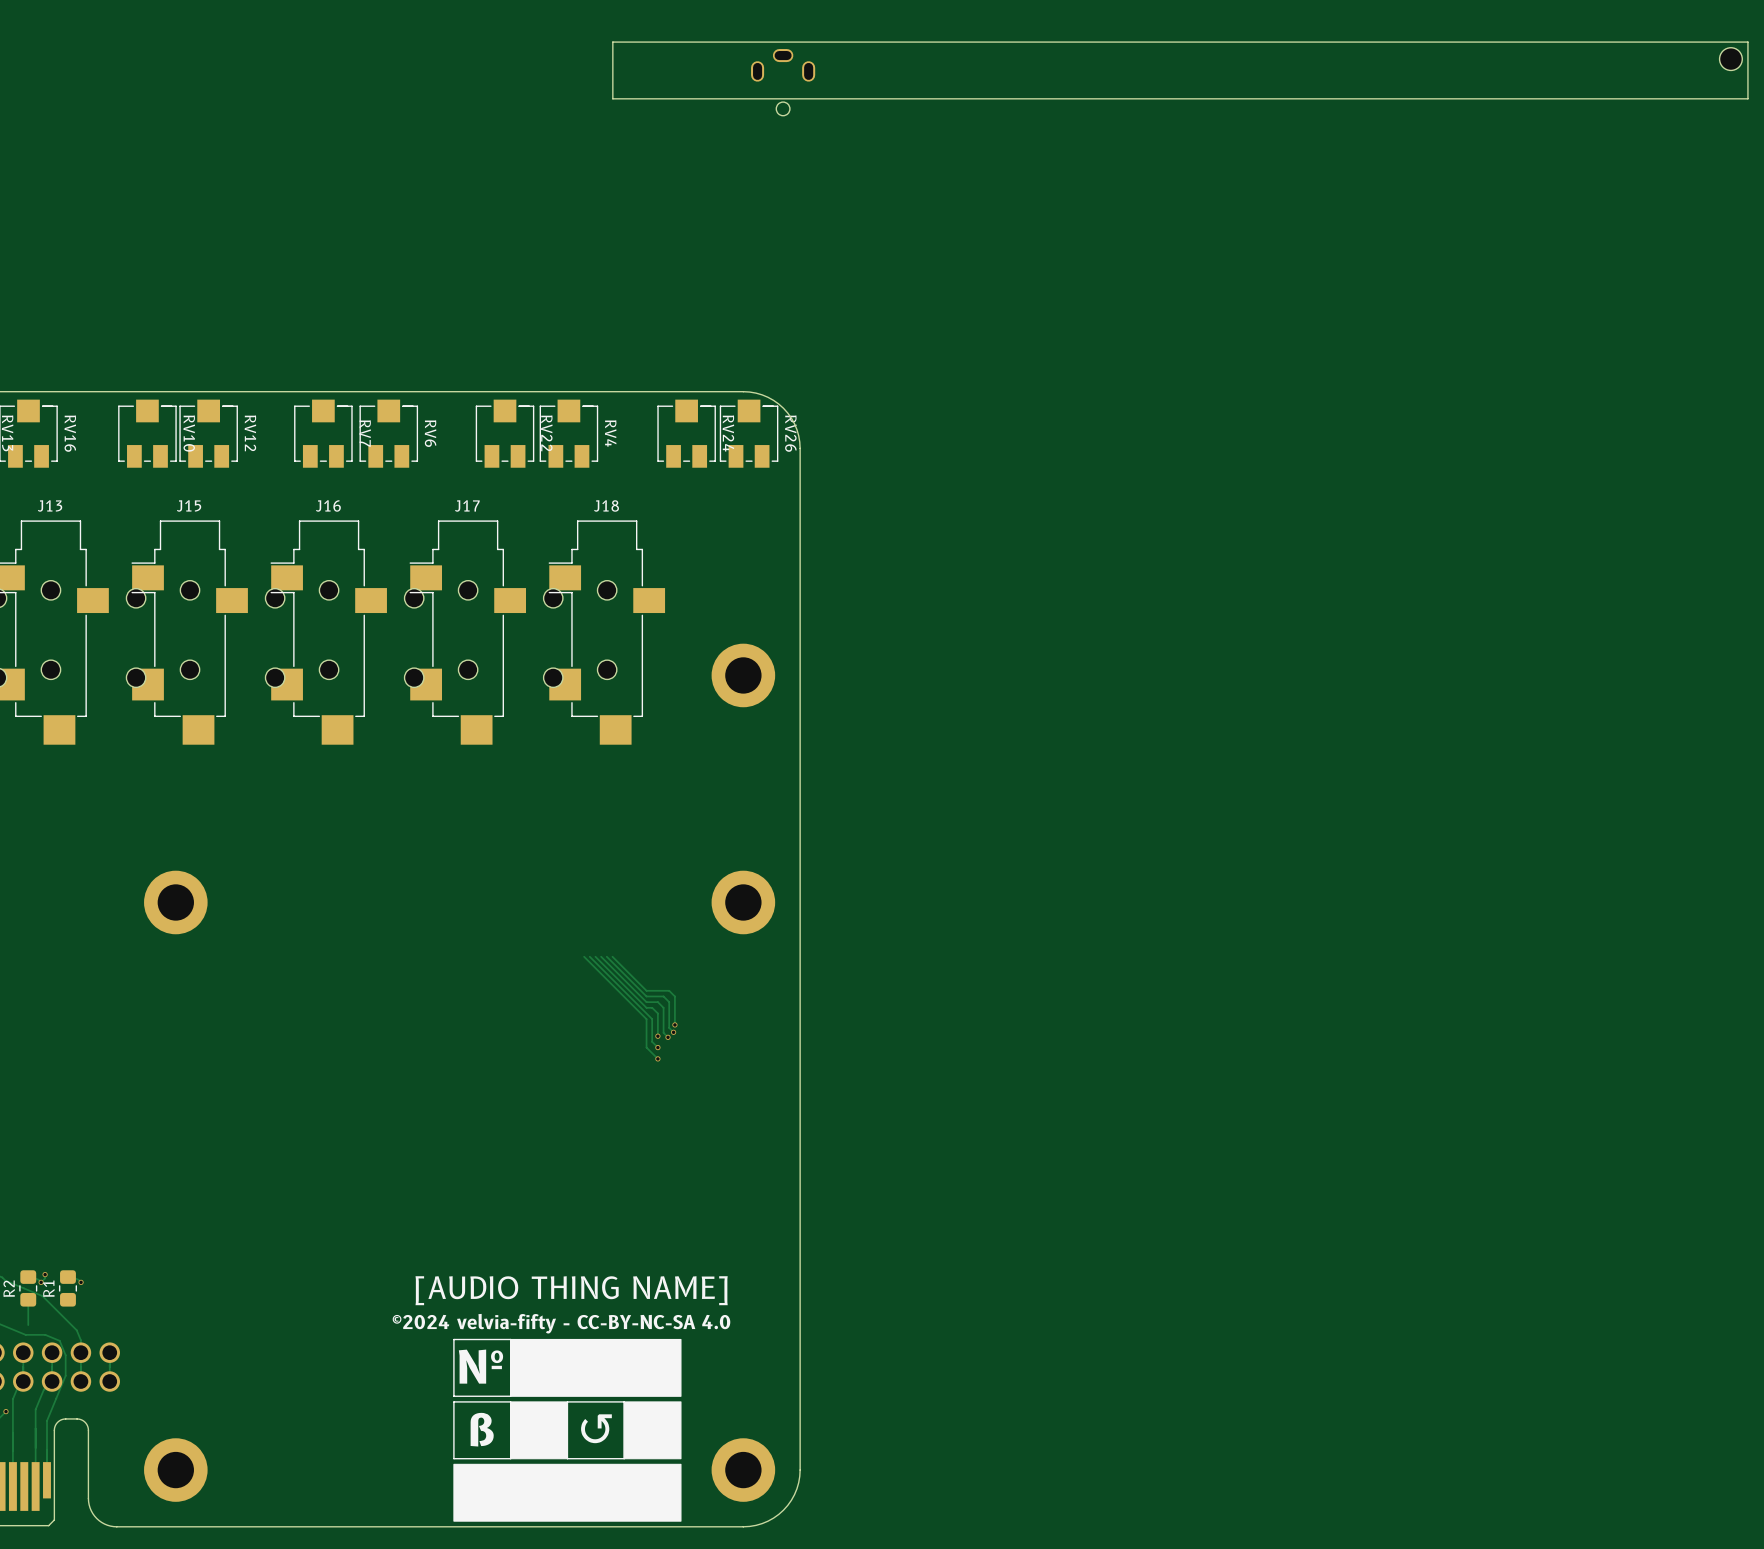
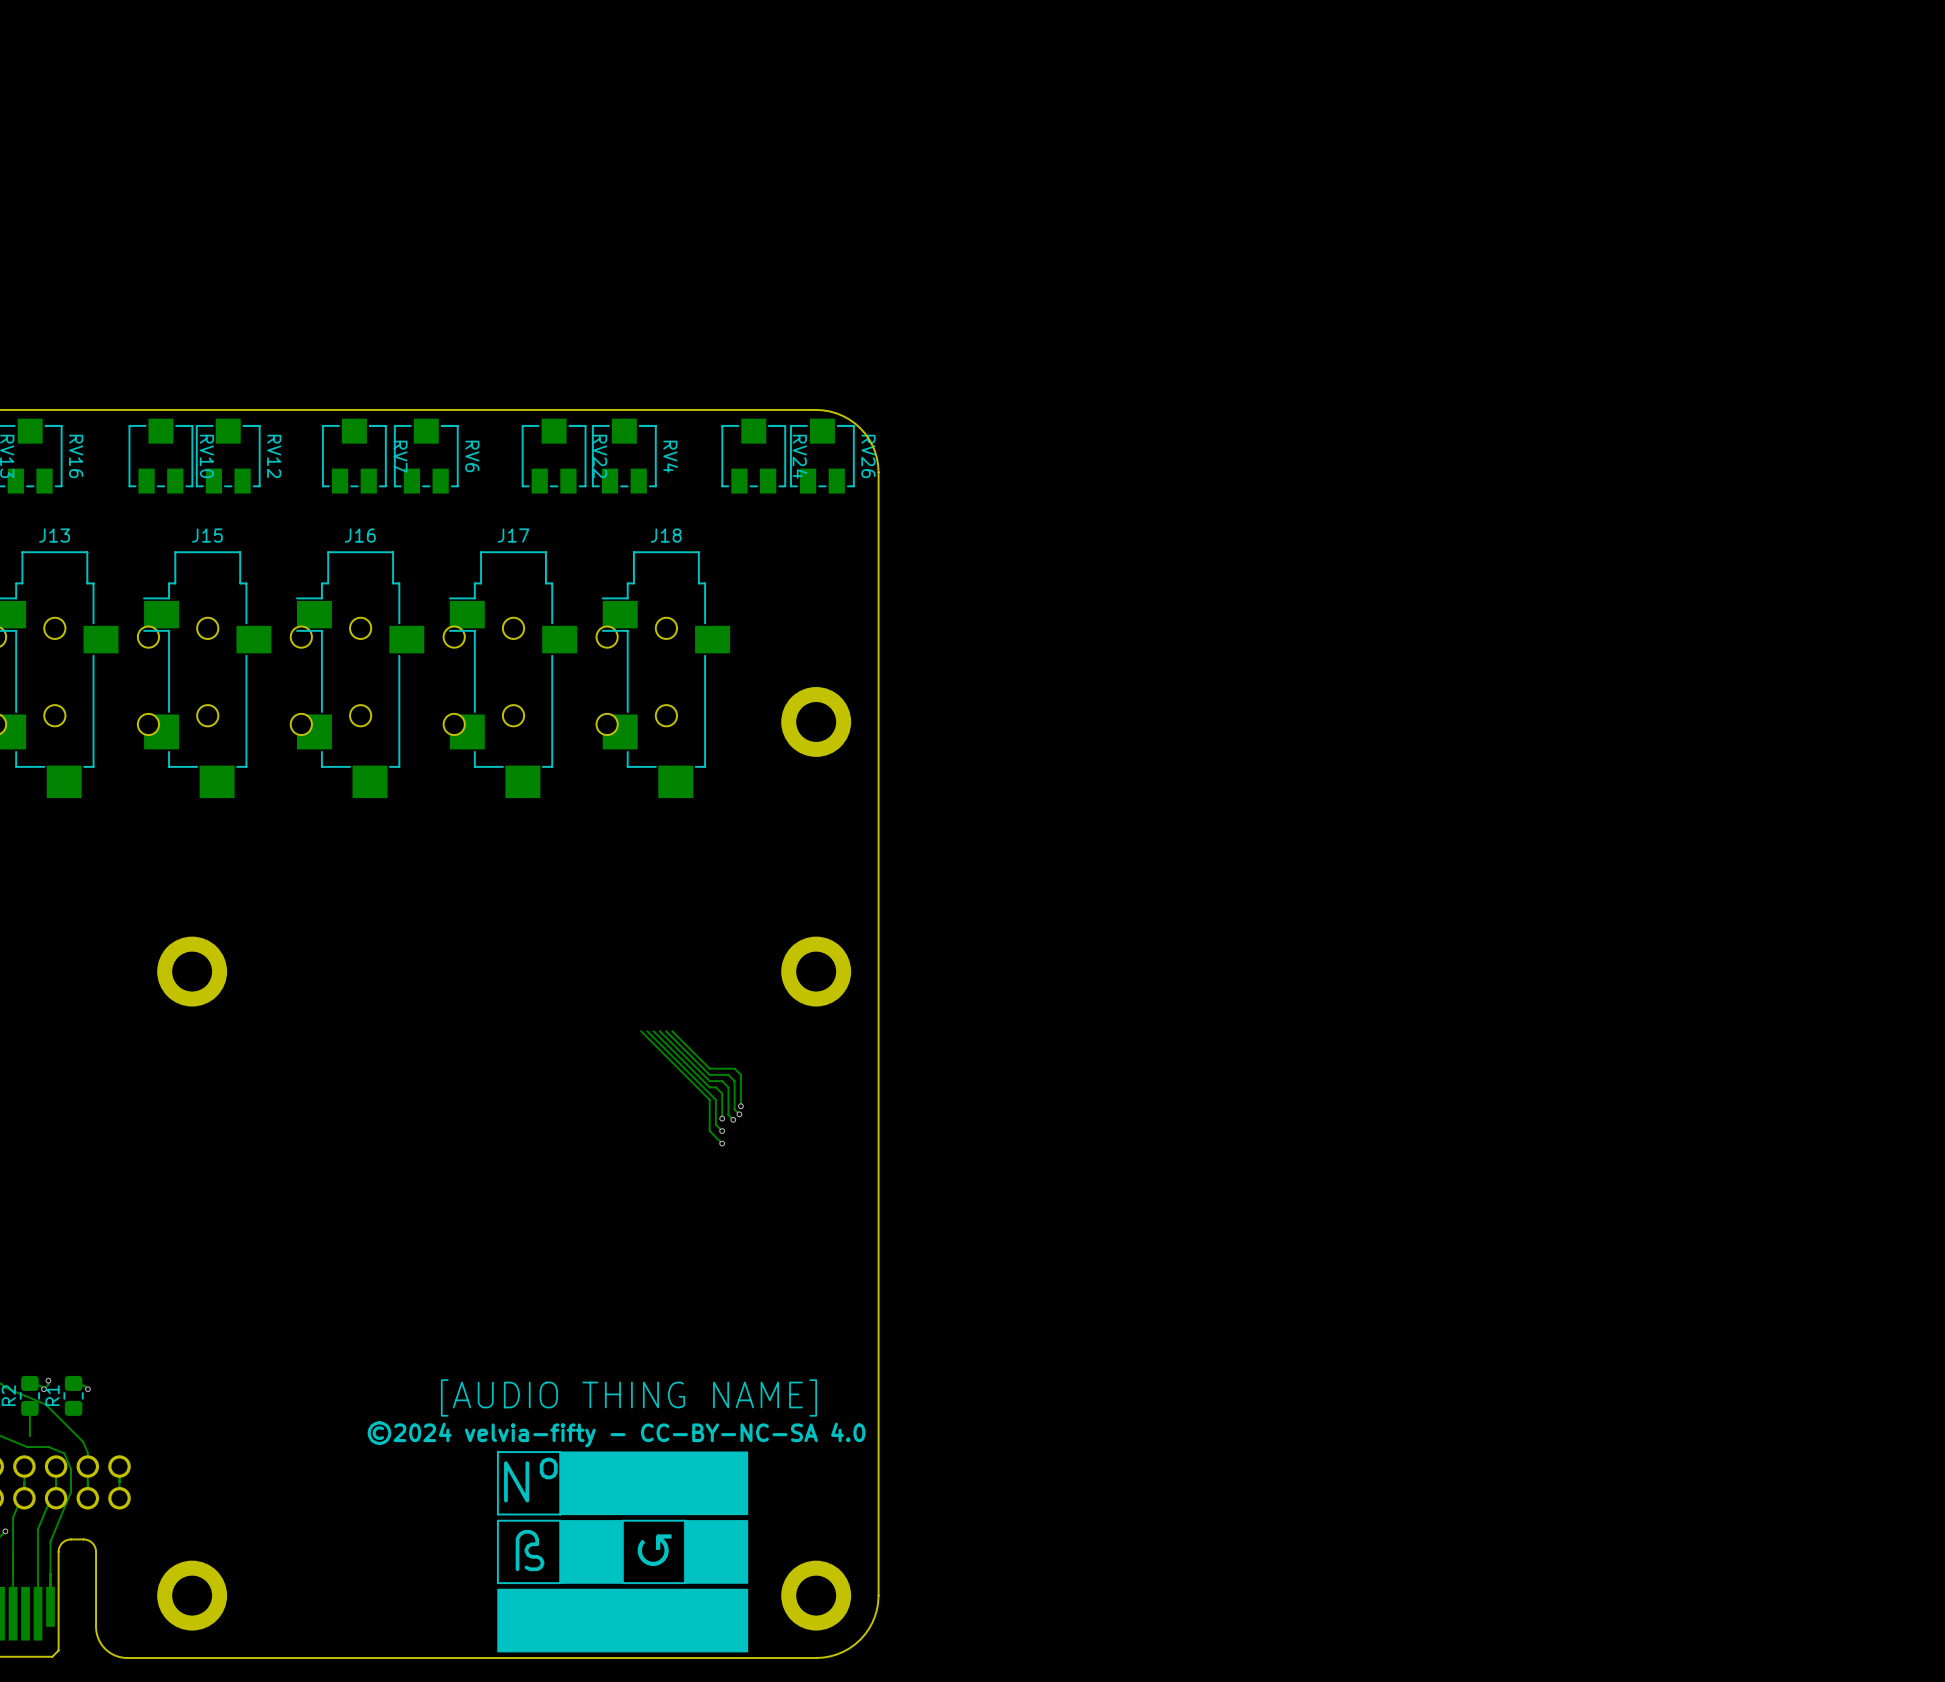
board edge: (1747, 42) (612, 42) (612, 98) (1747, 98) (1747, 42) -> none
part: (1730, 59) -> none
part: (783, 82) -> none

